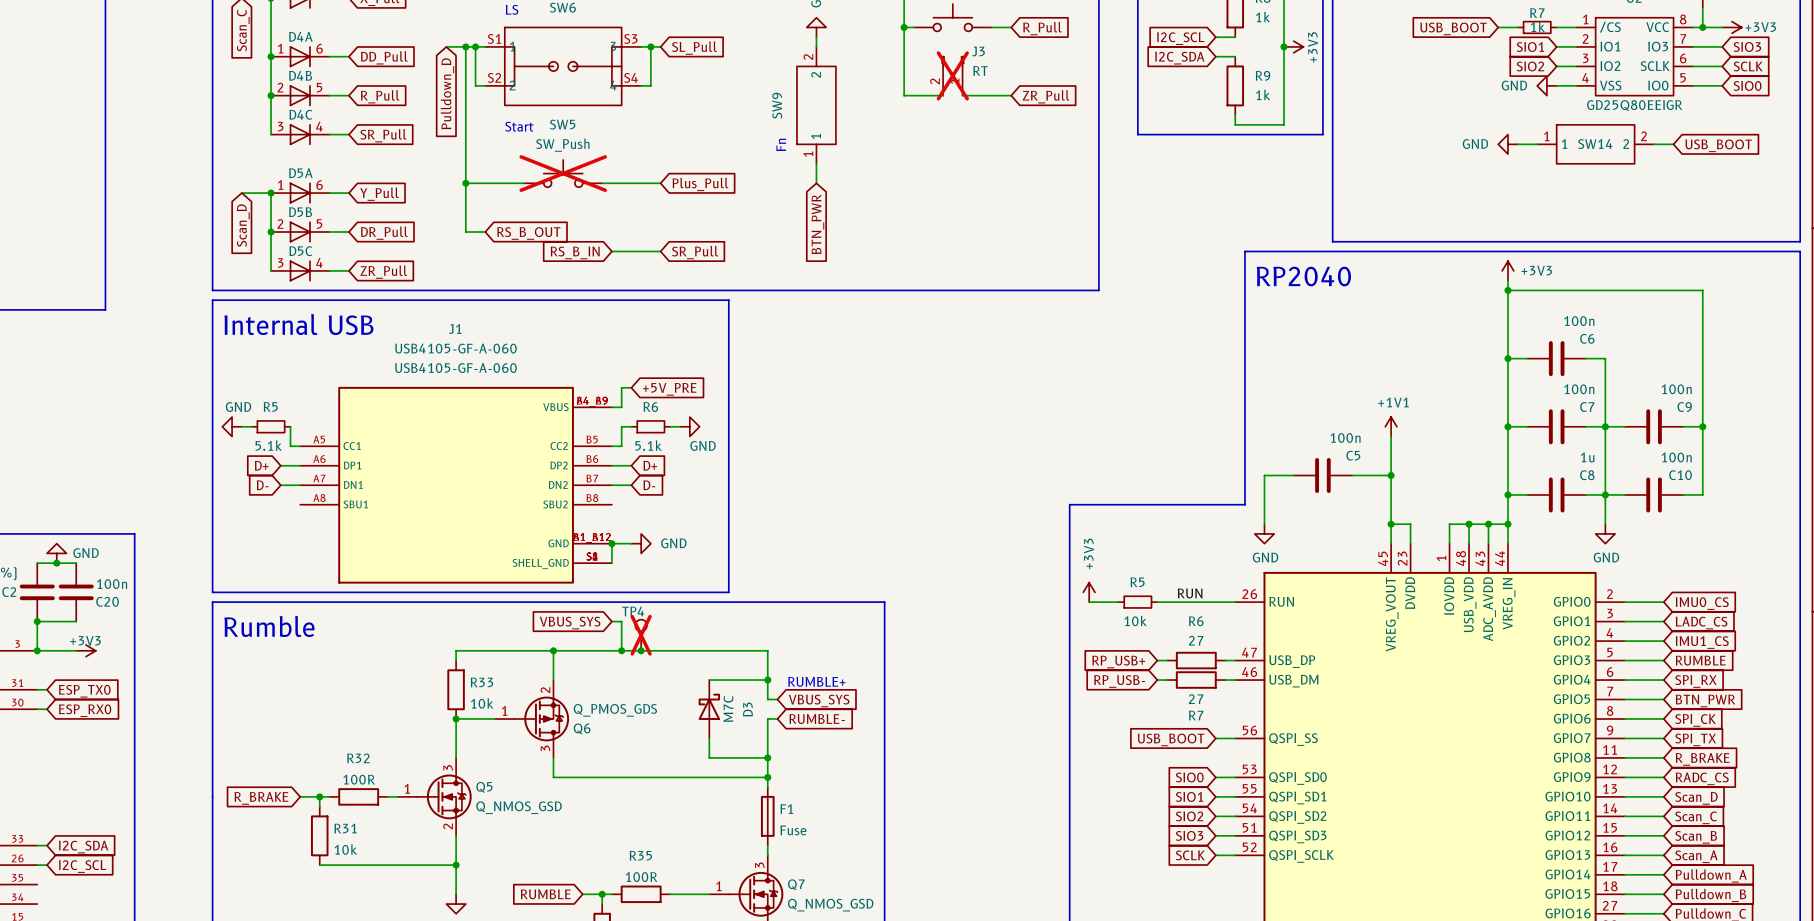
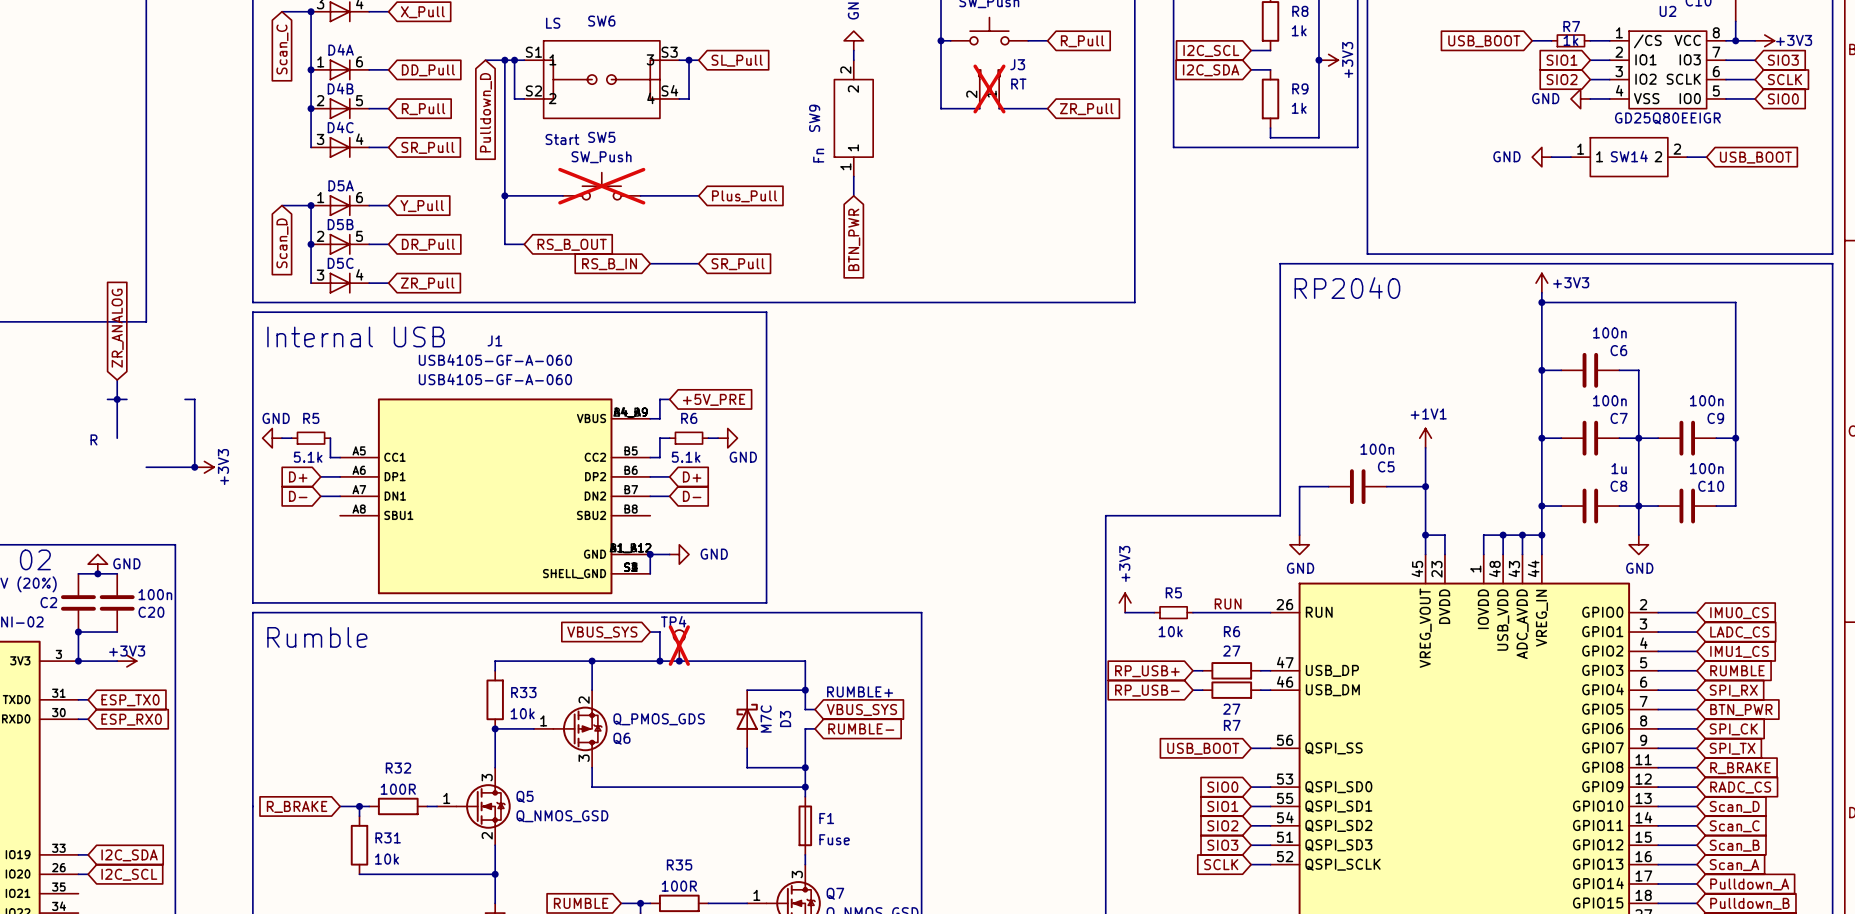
global label: none -> ZR_ANALOG (117, 328)
wire: none -> (117, 380) (117, 438)
wire: none -> (107, 399) (126, 399)
junction: none -> (117, 399)
wire: none -> (185, 399) (194, 399) (194, 467) (146, 467)
text: none -> R (93, 439)
junction: none -> (194, 467)
power symbol: none -> +3V3 (204, 467)

